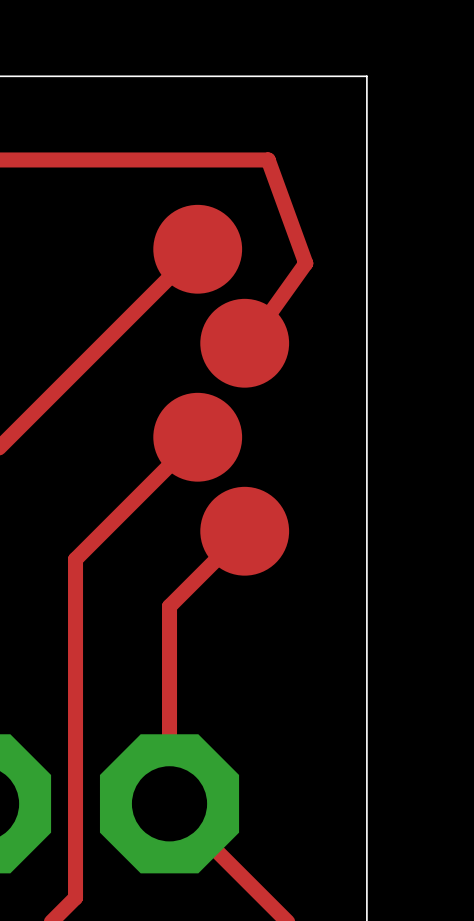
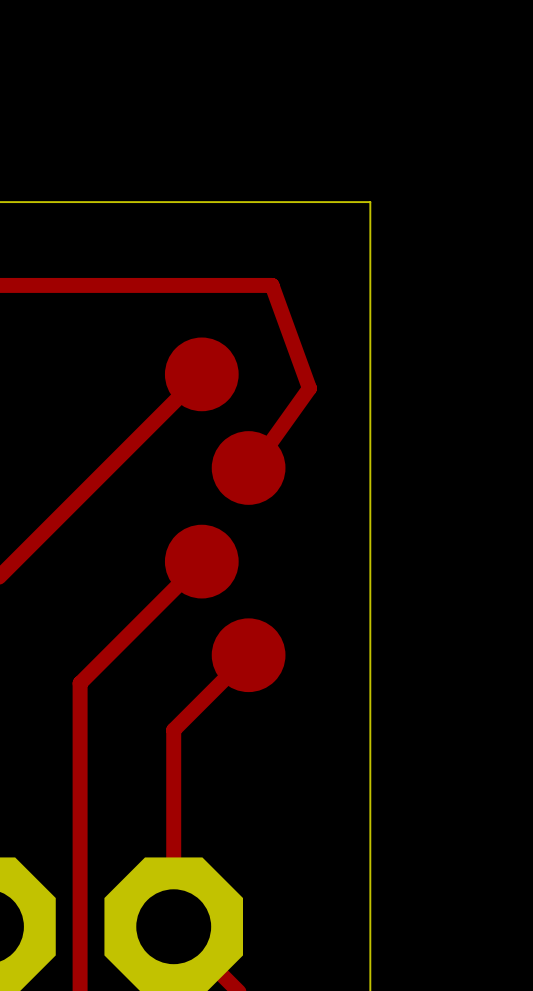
part footprint: [153, 204, 243, 294] -> [164, 337, 239, 412]
part footprint: [200, 298, 290, 388] -> [211, 431, 286, 505]
part footprint: [153, 392, 243, 482] -> [164, 524, 239, 599]
part footprint: [200, 486, 290, 576] -> [211, 618, 286, 693]

